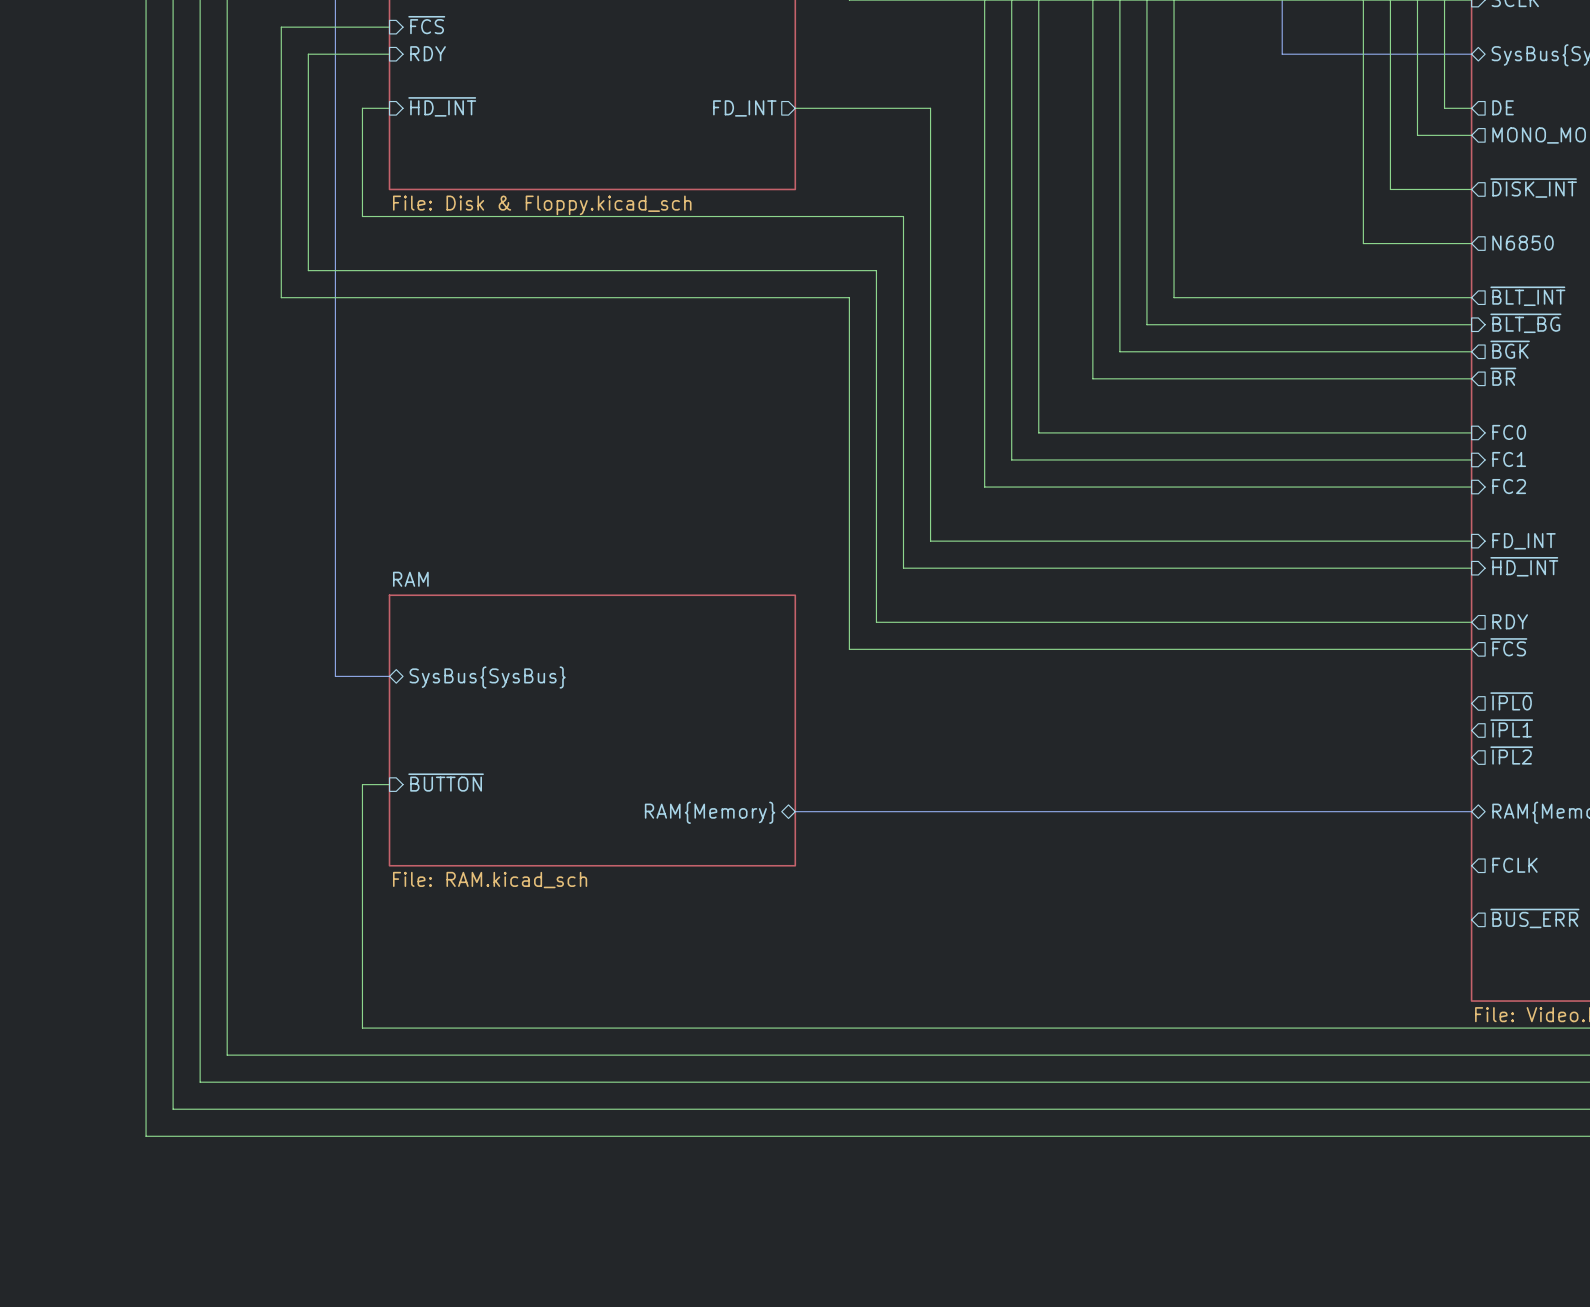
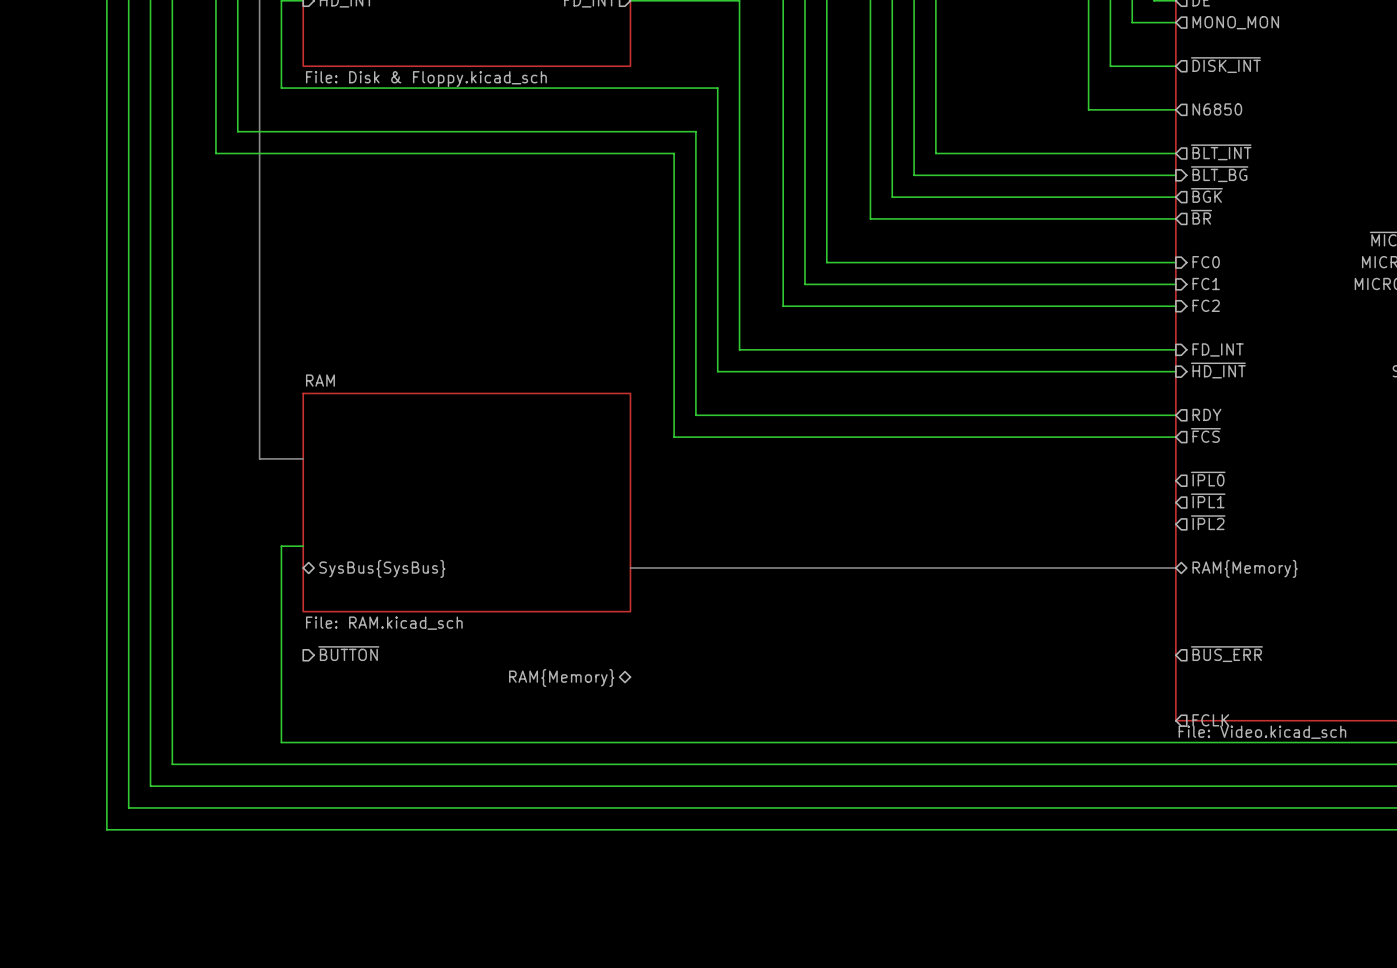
sheet pin position: SysBus{SysBus} (487, 677) -> SysBus{SysBus} (382, 568)
sheet pin position: ~{BUTTON} (446, 782) -> ~{BUTTON} (348, 653)
sheet pin position: RAM{Memory} (710, 812) -> RAM{Memory} (561, 677)
sheet pin position: FCLK (1514, 865) -> FCLK (1210, 720)

